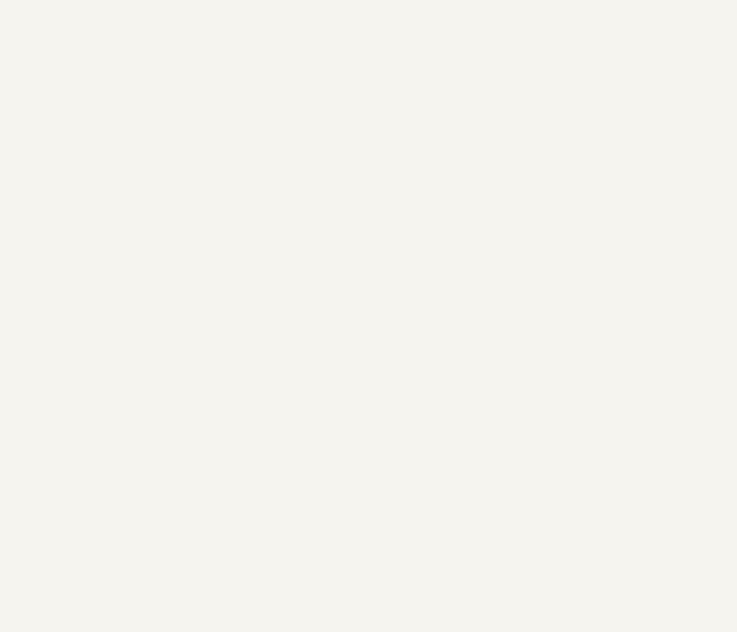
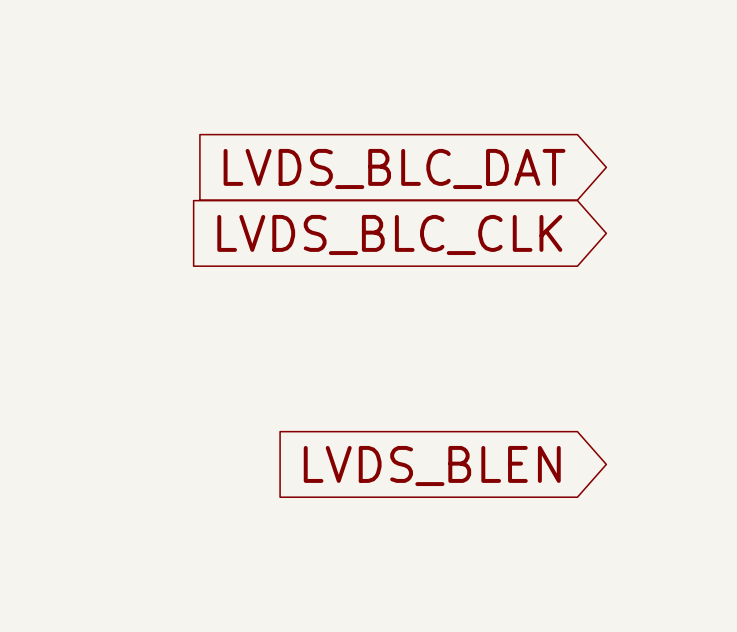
global label: none -> LVDS_BLC_DAT (394, 168)
global label: none -> LVDS_BLC_CLK (389, 234)
global label: none -> LVDS_BLEN (432, 466)

